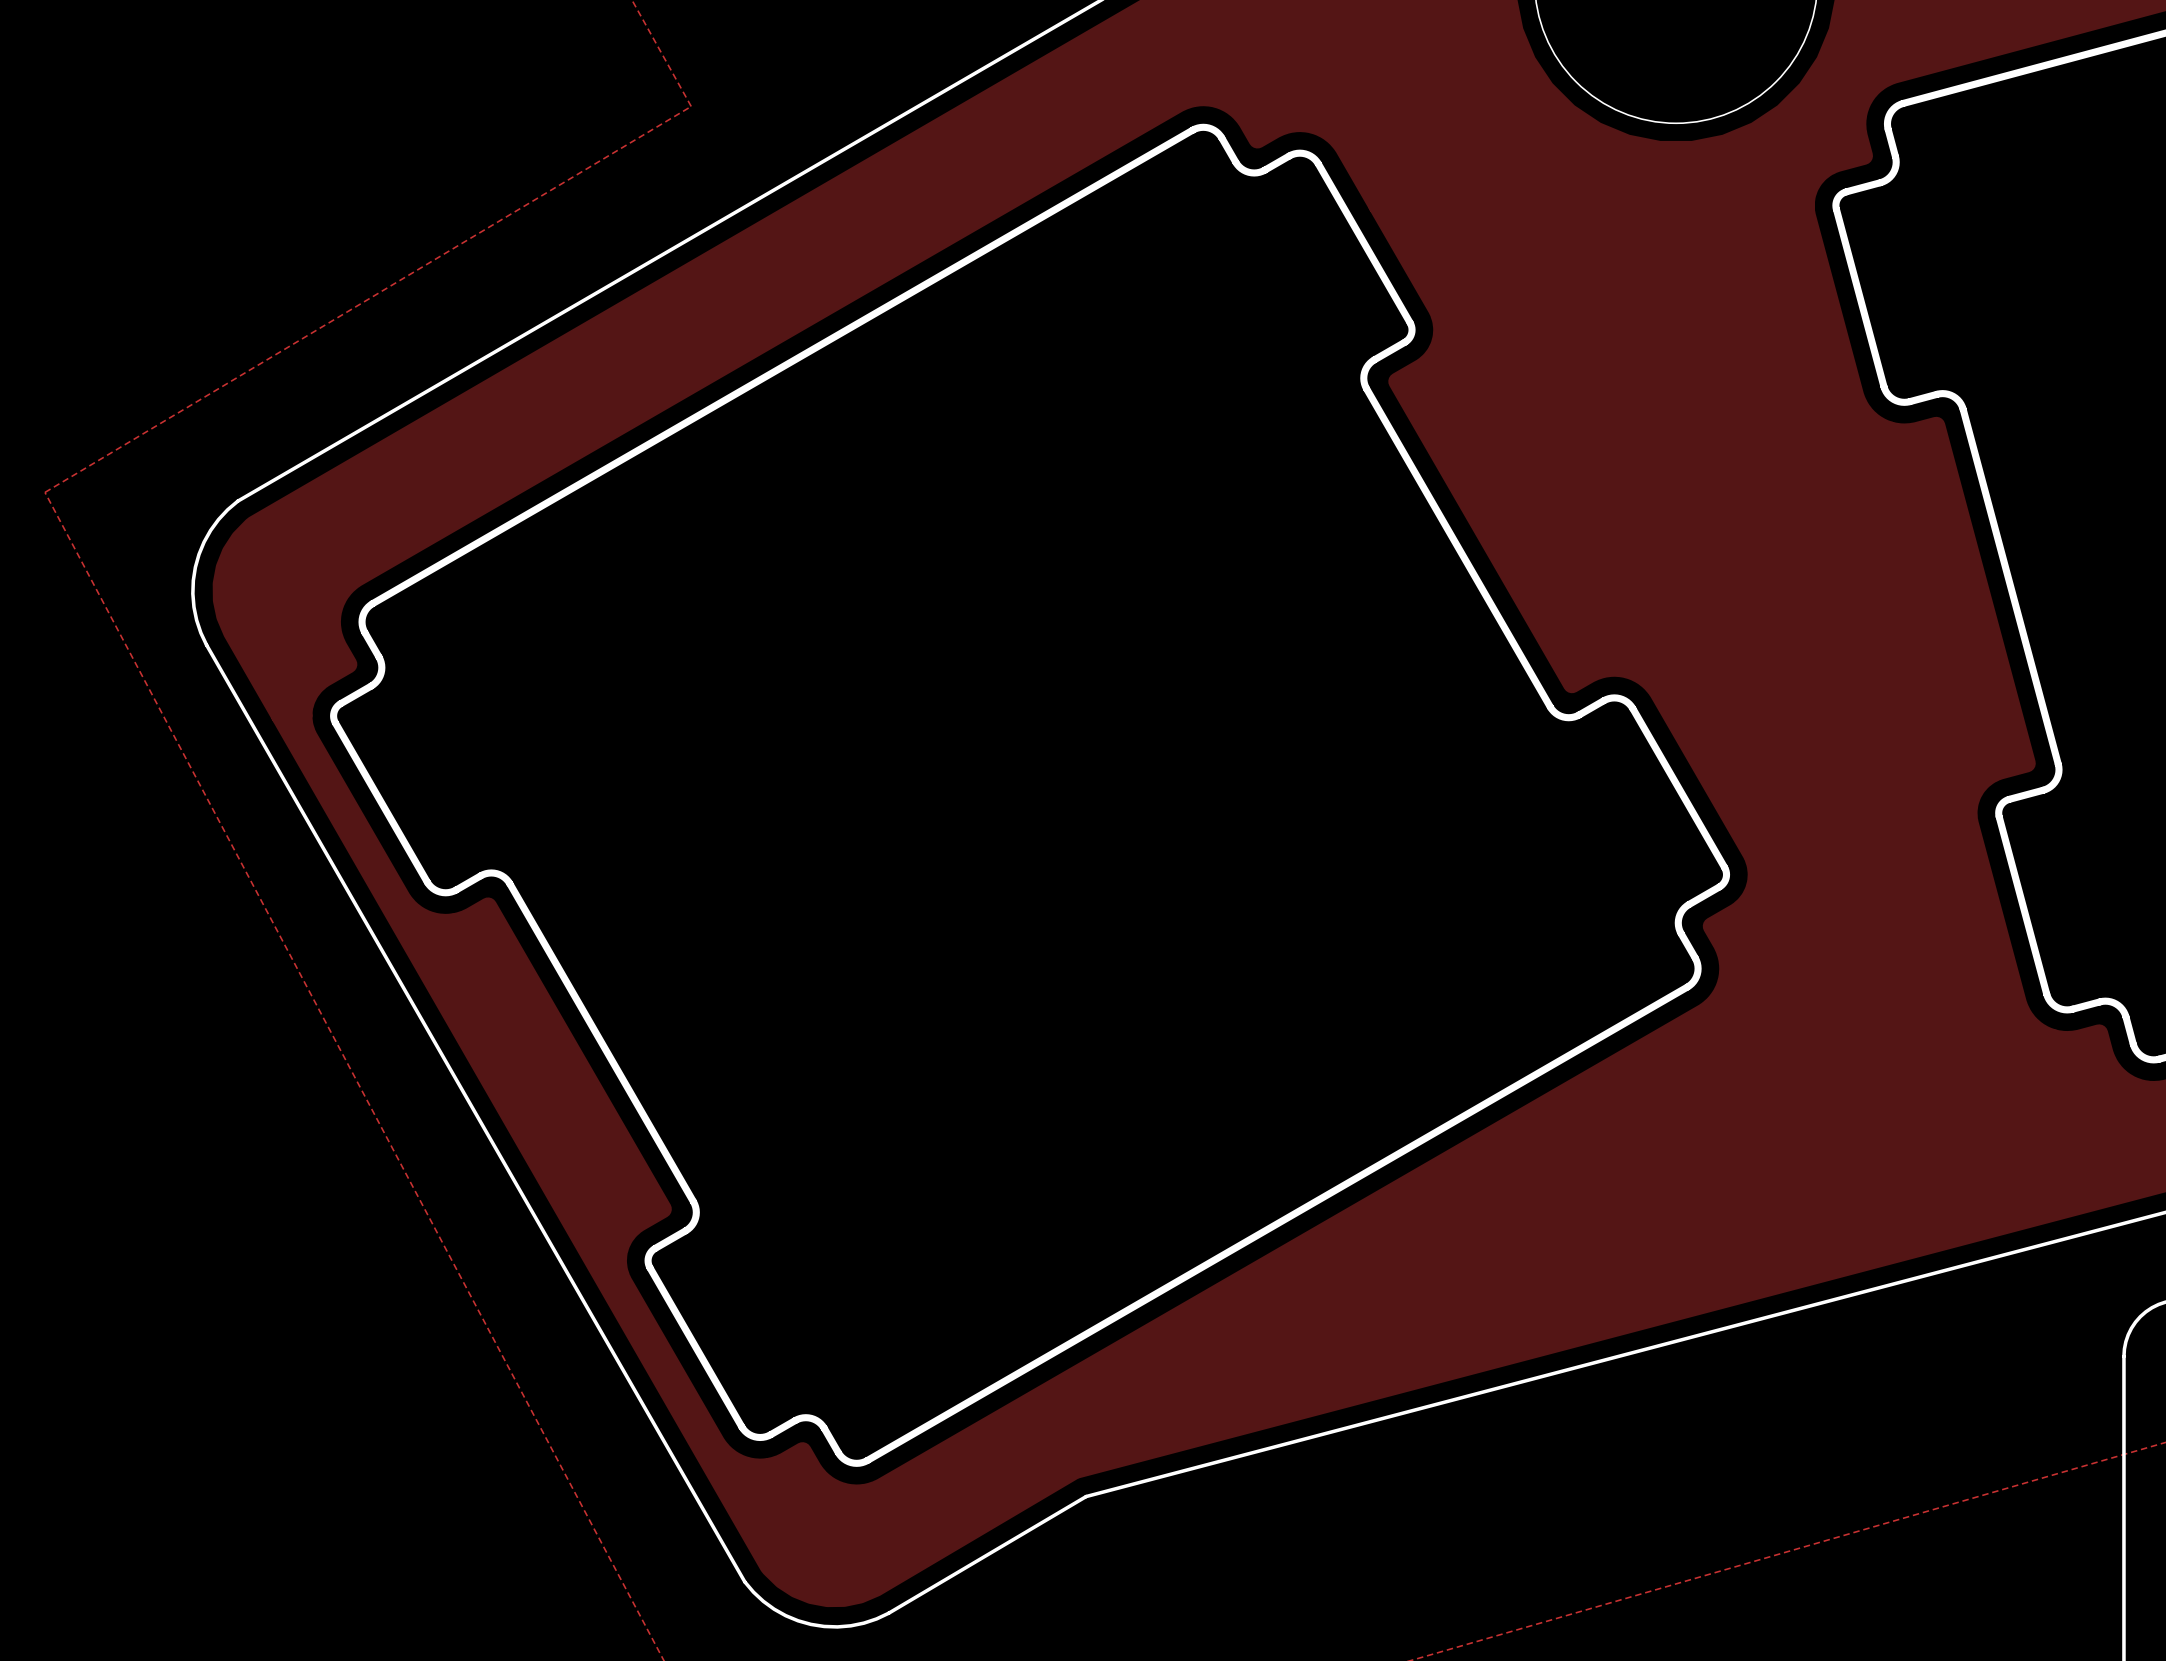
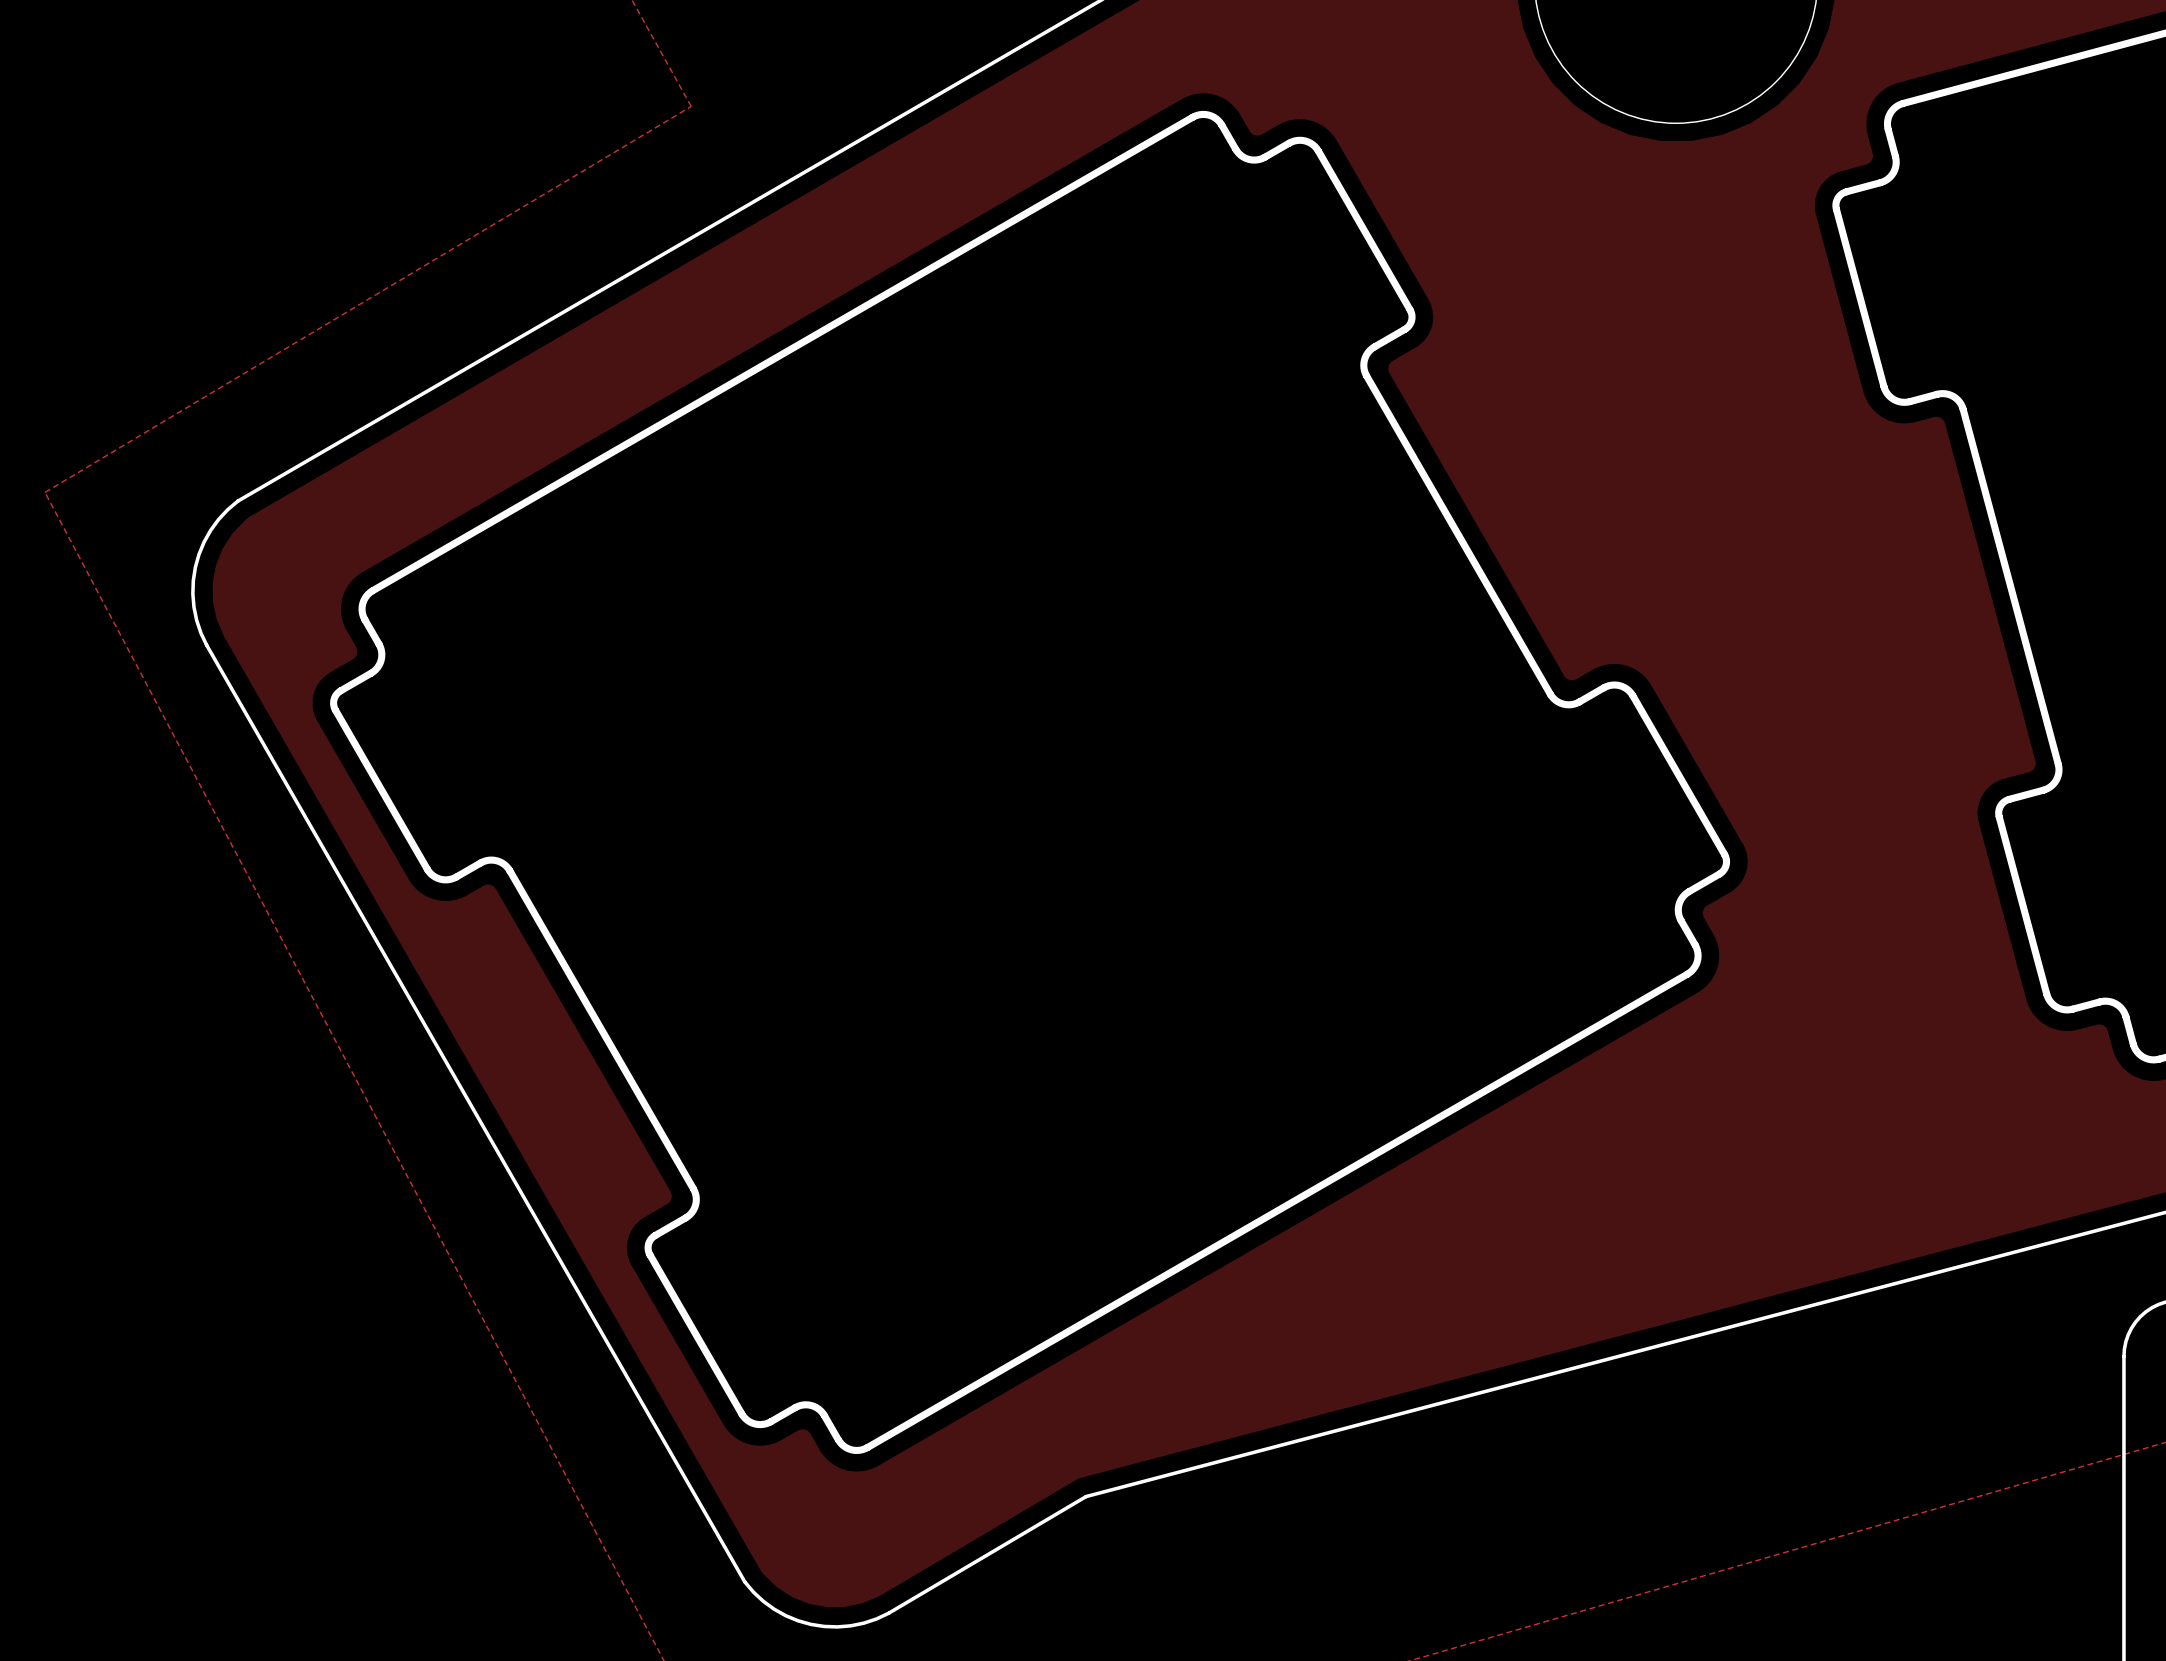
drawing position: (1030, 795) -> (1030, 782)

